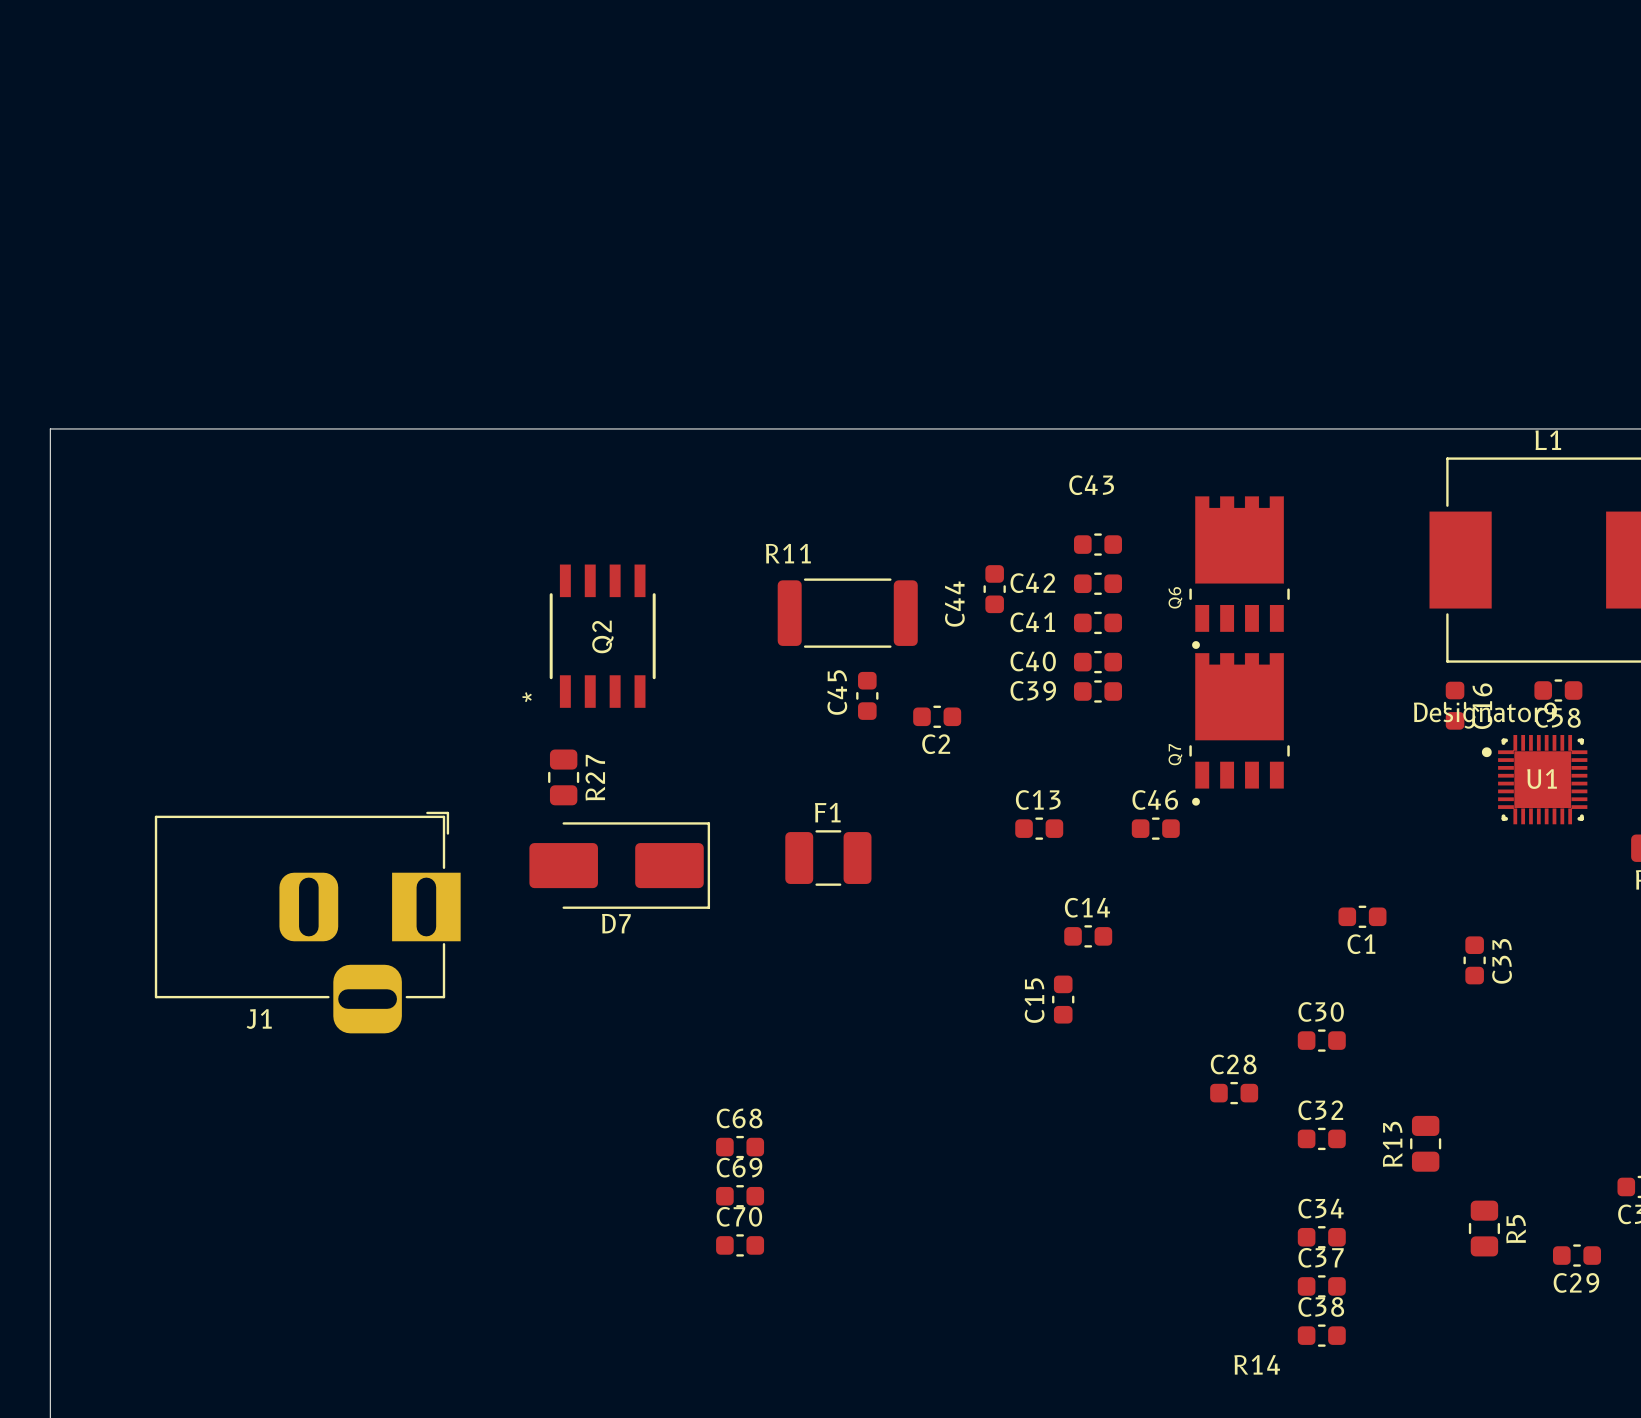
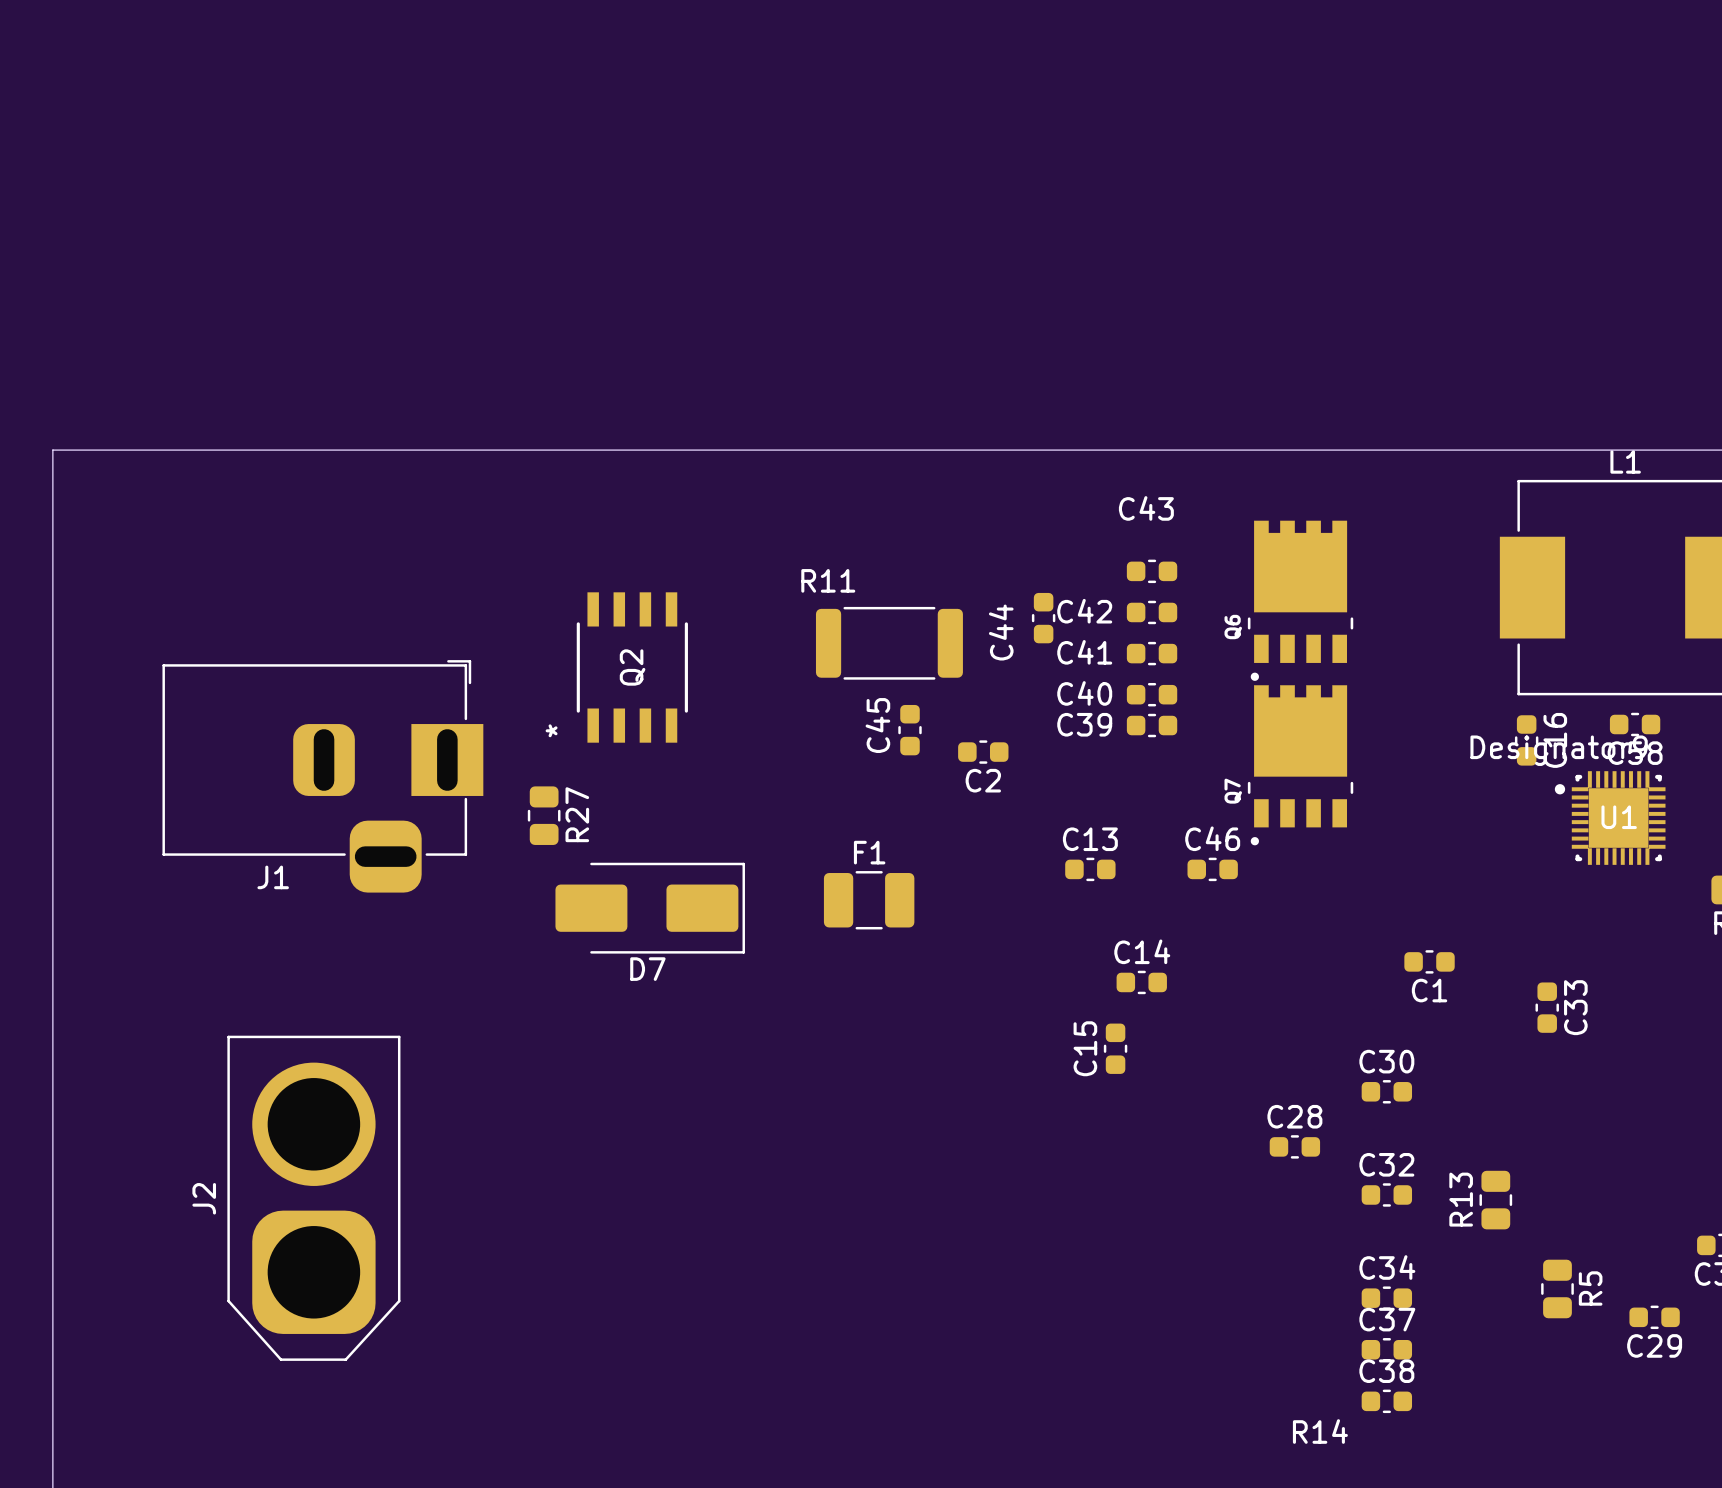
R27 position: (563, 777) -> (544, 815)
J1 position: (307, 922) -> (322, 776)
J2: none -> (313, 1198)
C68: (740, 1147) -> none
C69: (740, 1196) -> none
C70: (740, 1245) -> none

